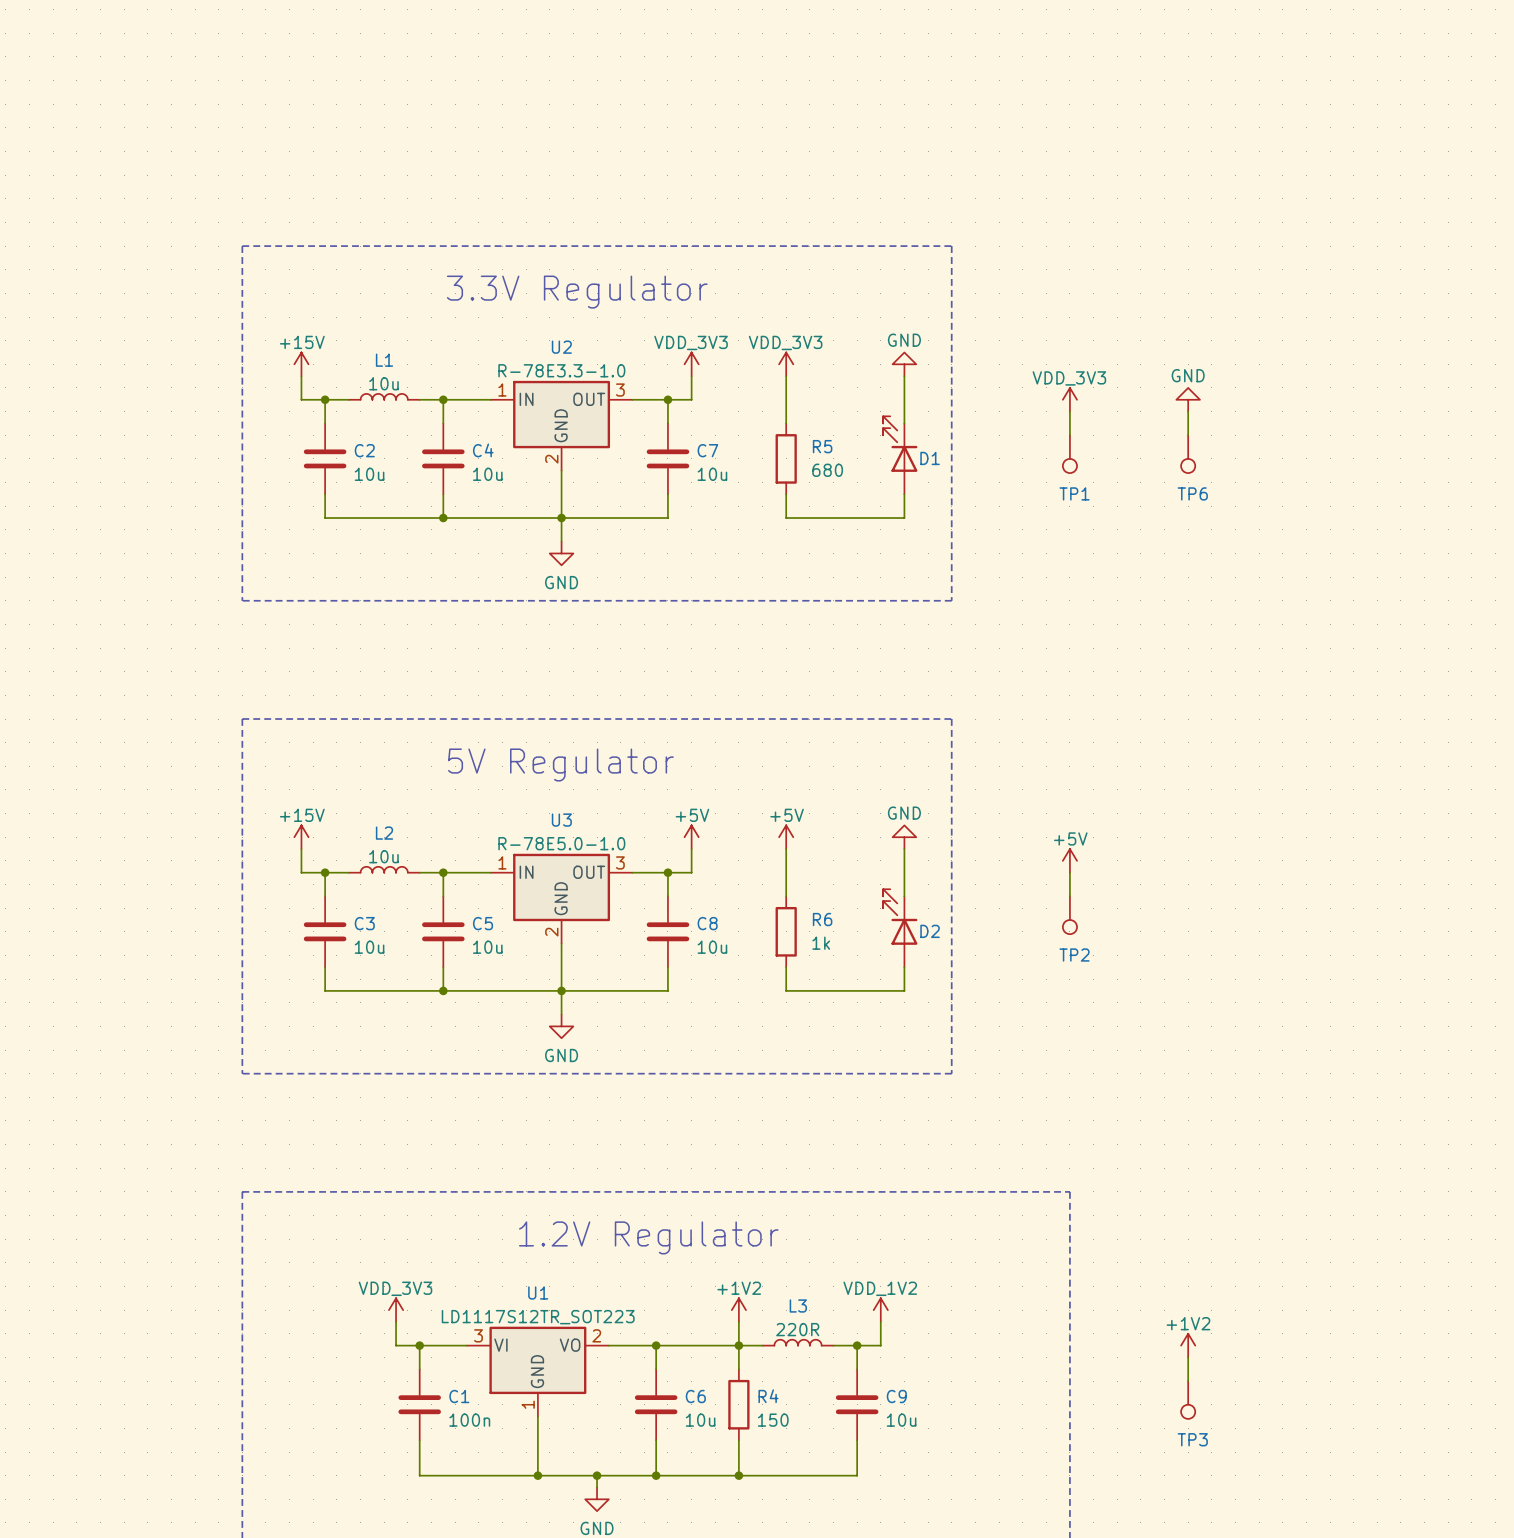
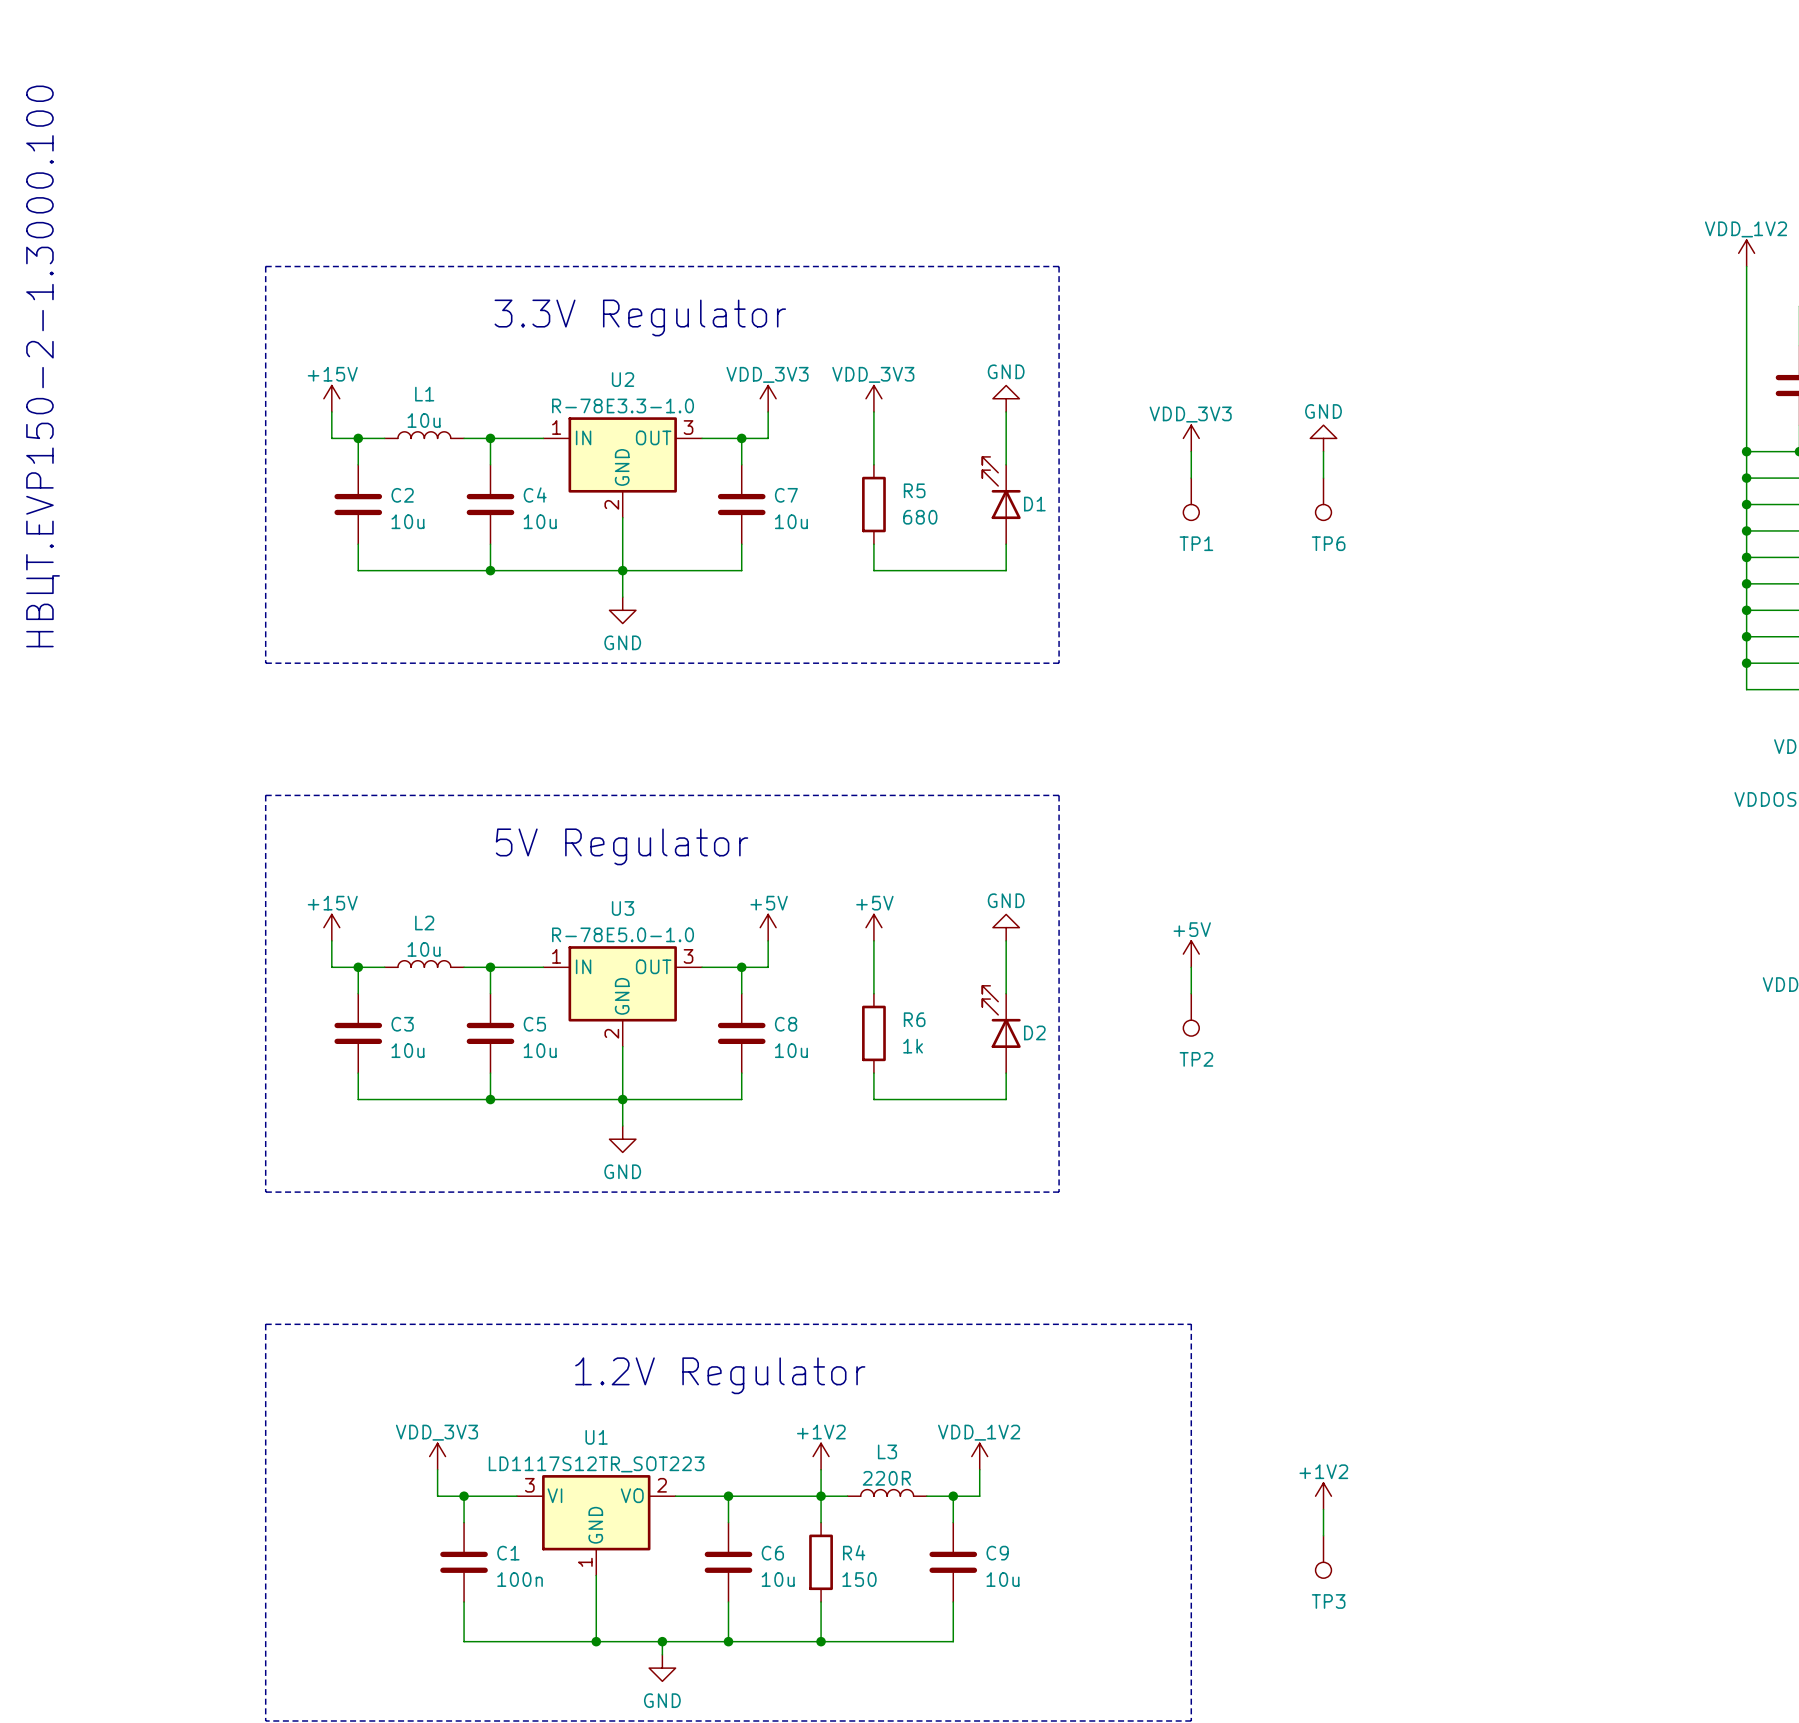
text: none -> НВЦТ.EVP150-2-1.3000.100 (43, 366)

